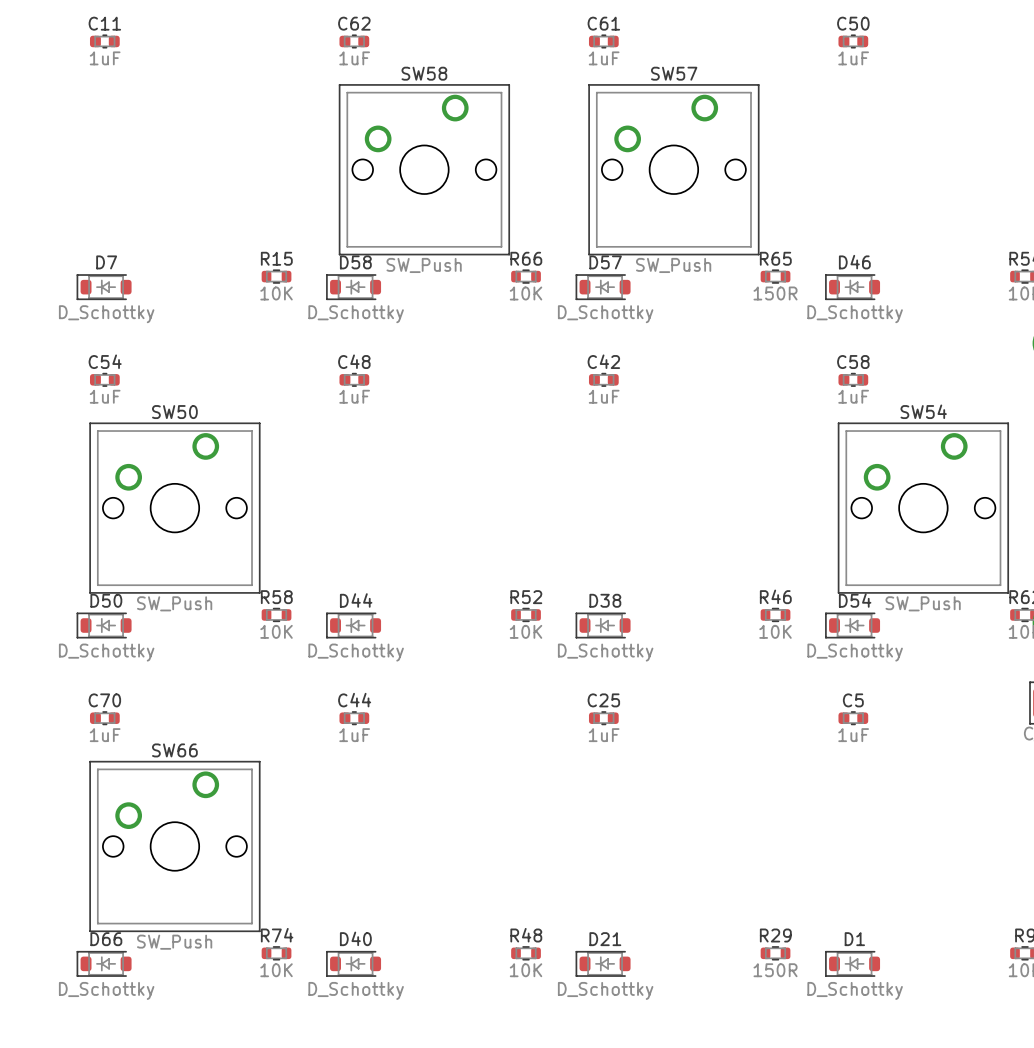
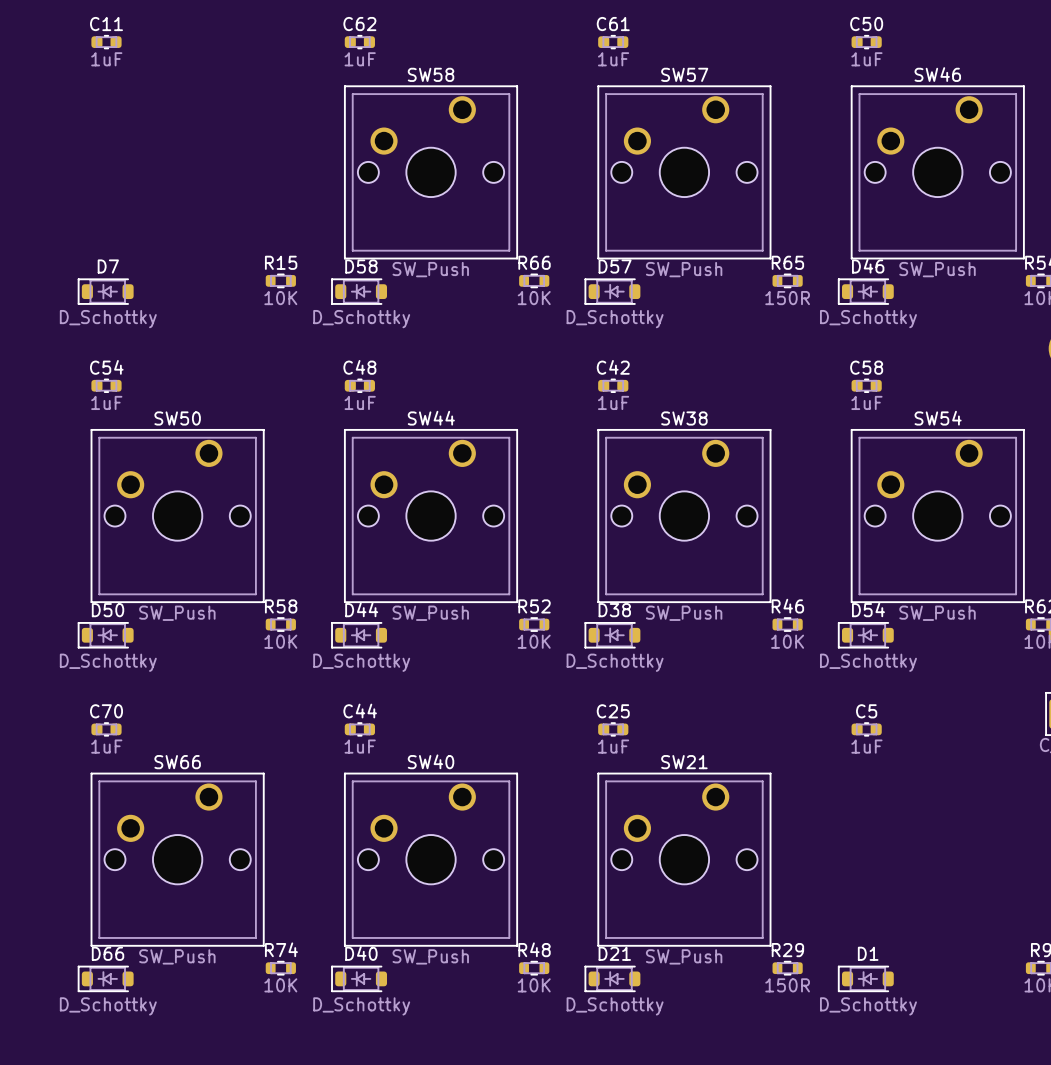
SW46: none -> SW_Push (937, 172)
SW44: none -> SW_Push (431, 516)
SW38: none -> SW_Push (684, 516)
SW40: none -> SW_Push (431, 859)
SW21: none -> SW_Push (684, 859)

